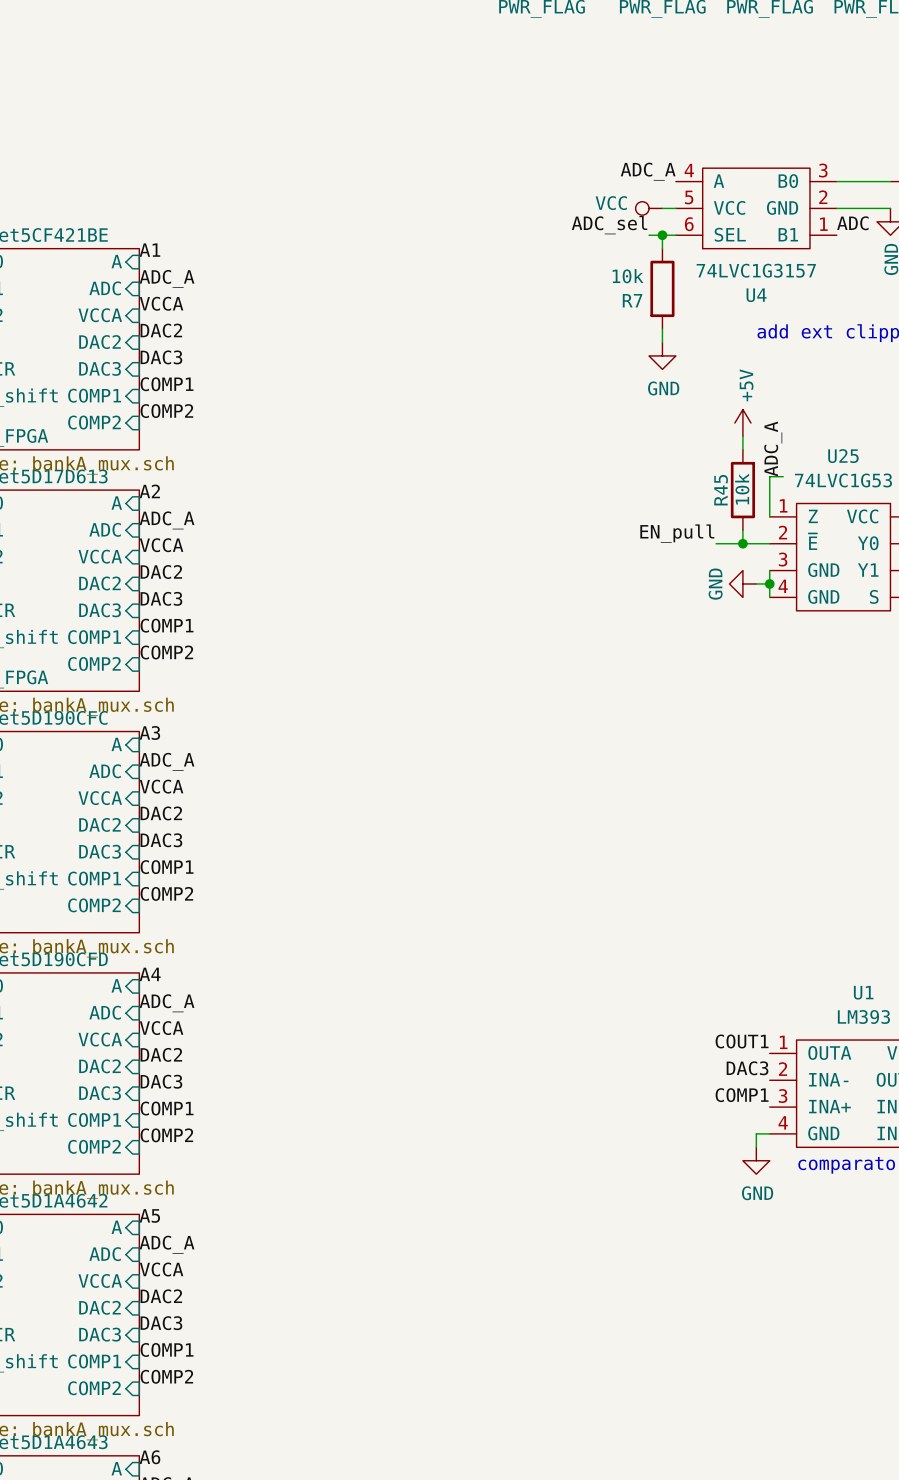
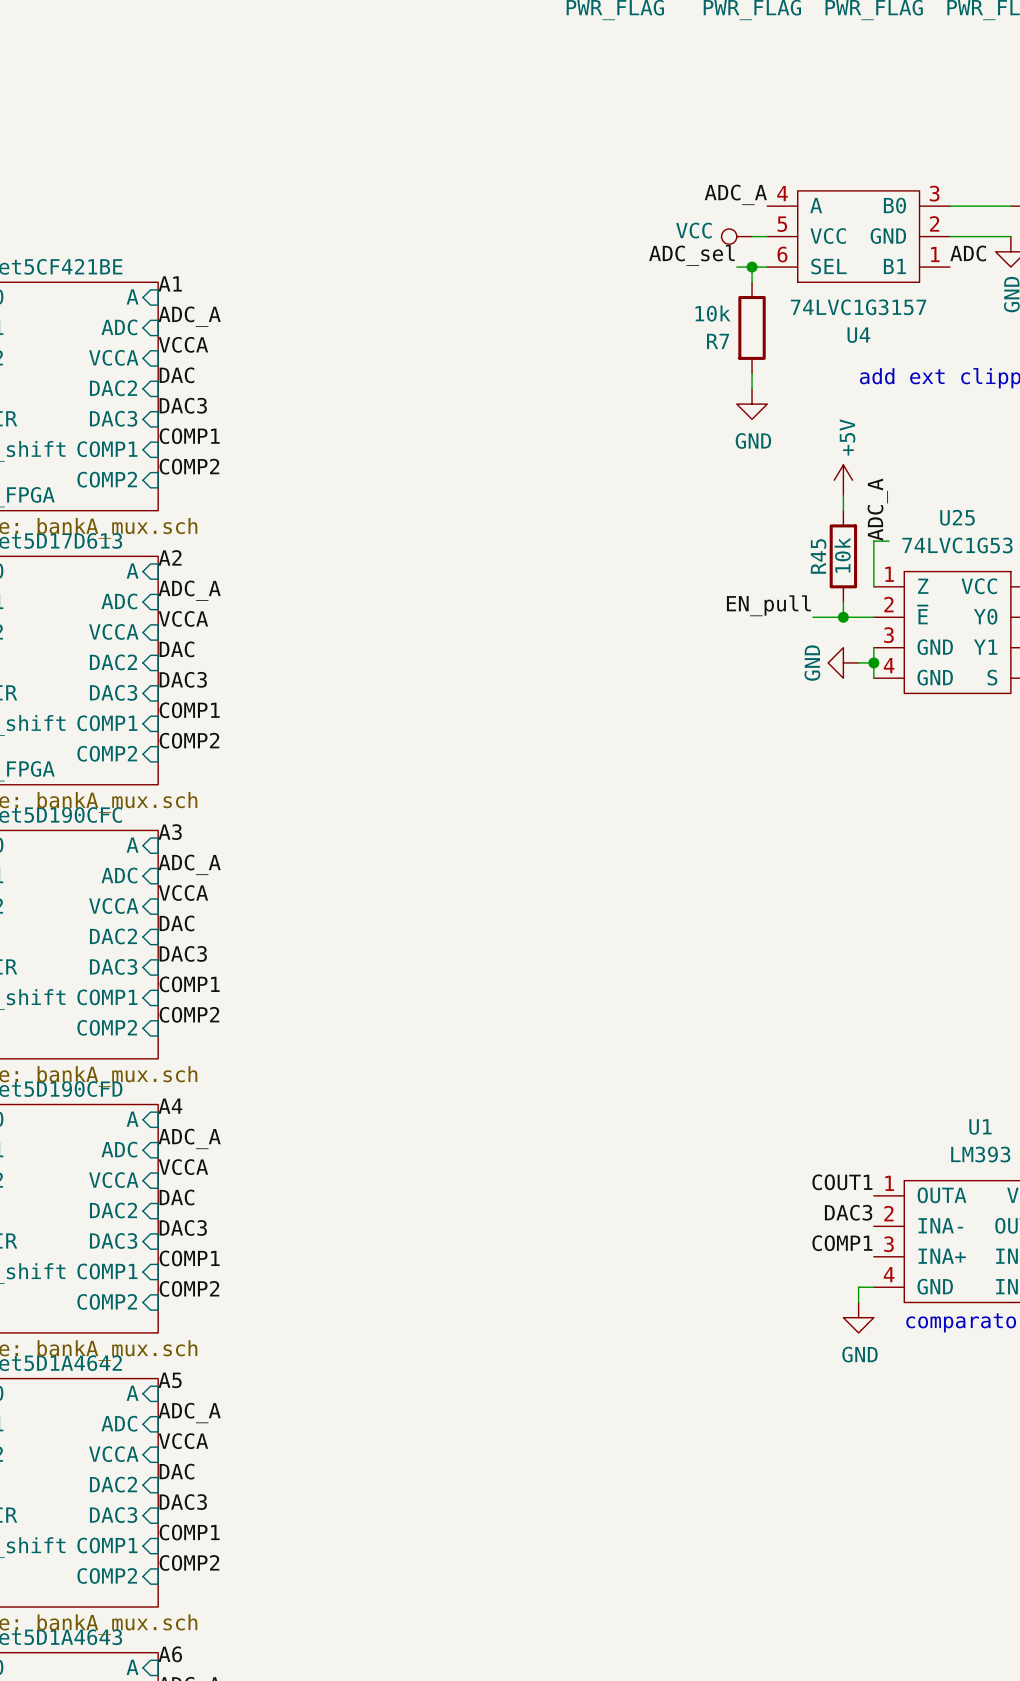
label: DAC2 (161, 330) -> DAC (176, 375)
label: DAC2 (161, 572) -> DAC (176, 649)
label: DAC2 (161, 813) -> DAC (176, 923)
label: DAC2 (161, 1054) -> DAC (176, 1197)
label: DAC2 (161, 1296) -> DAC (176, 1471)

